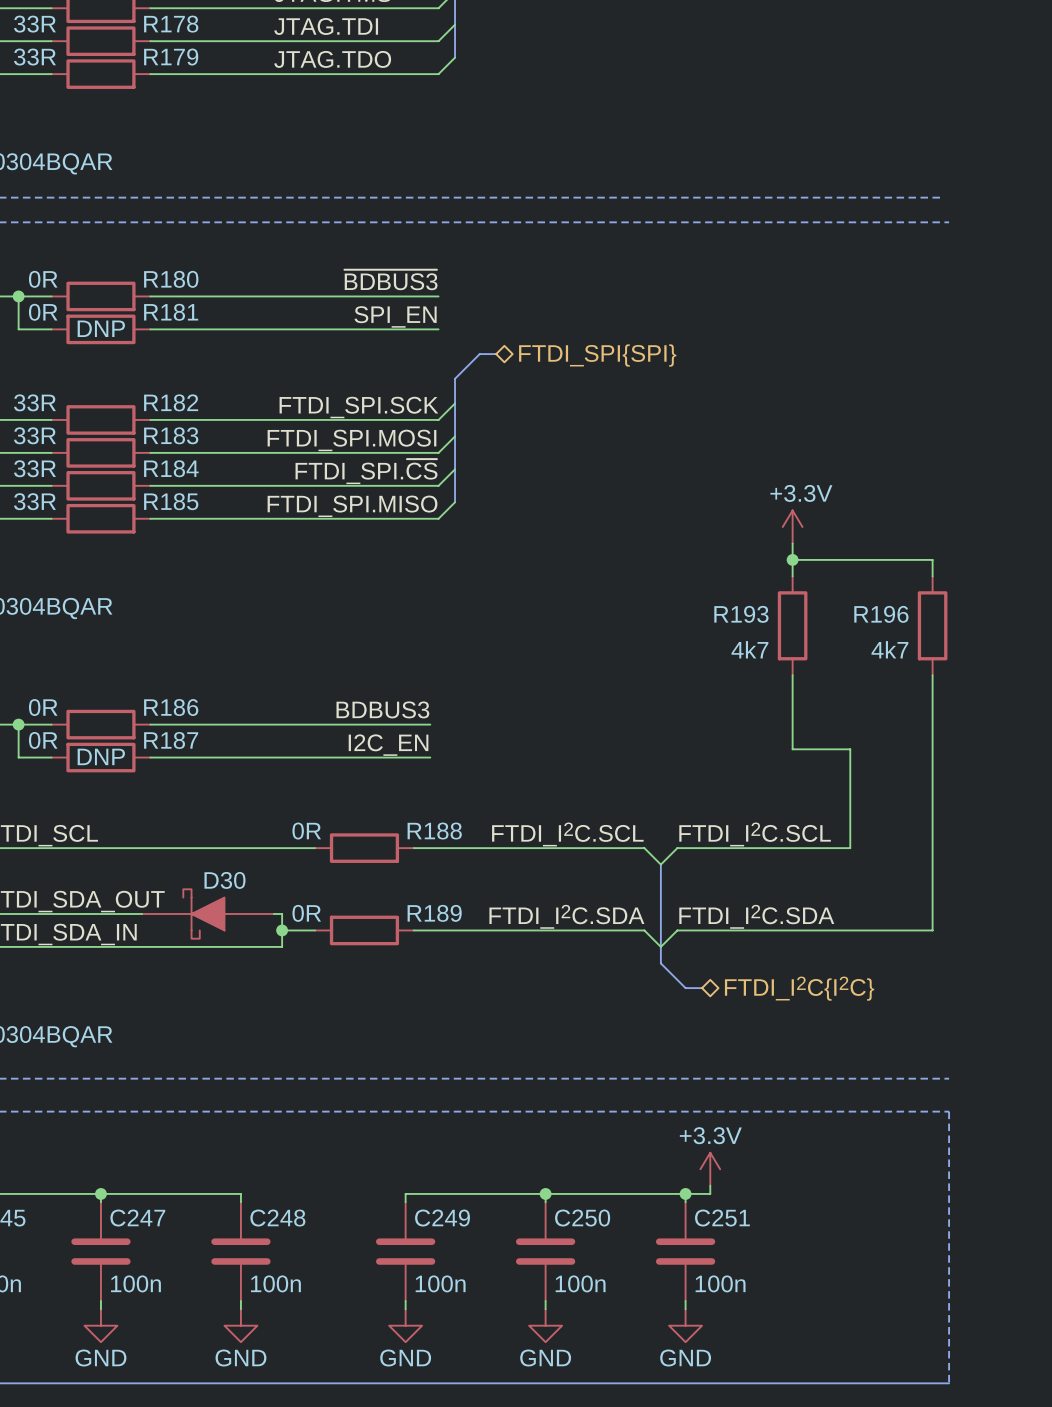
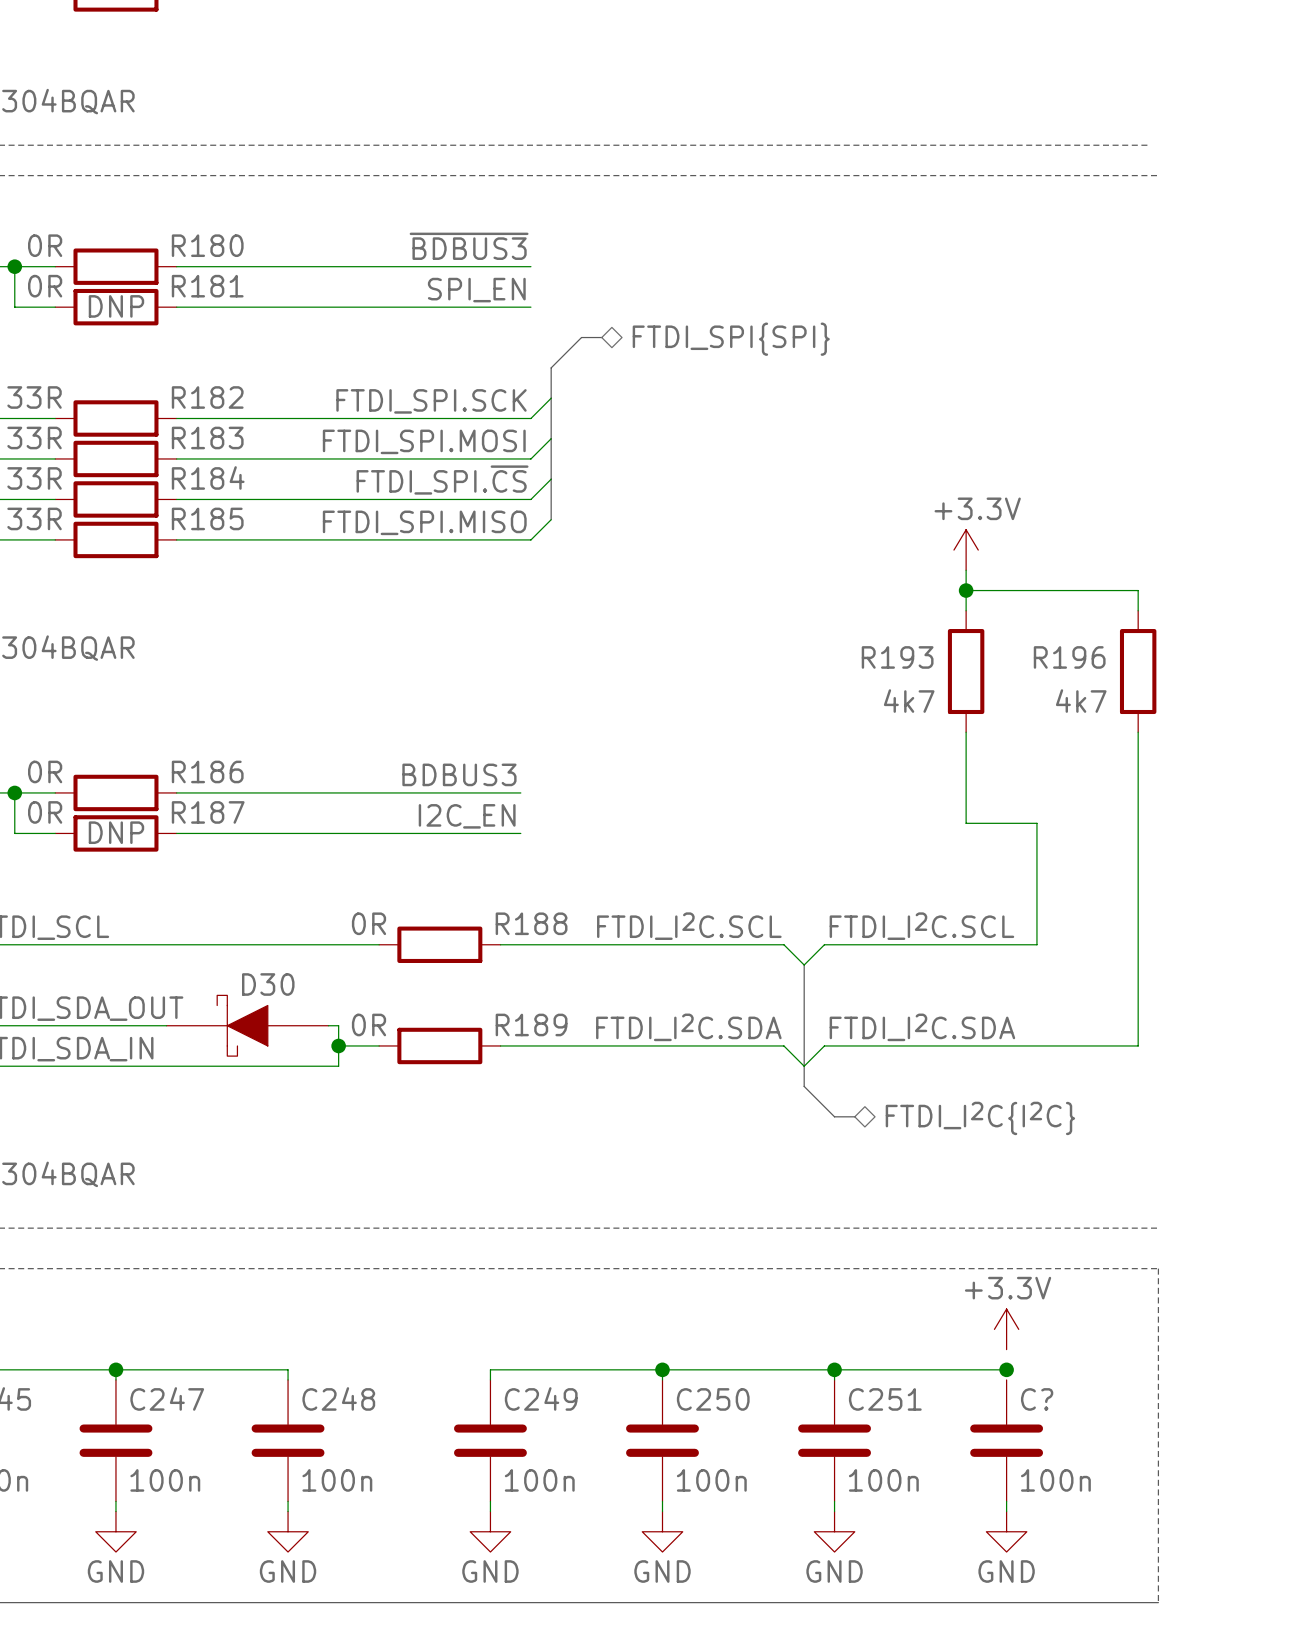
power symbol position: +3.3V (710, 1169) -> +3.3V (1006, 1329)
wire: (710, 1185) (710, 1193) -> (1006, 1369) (864, 1369)
junction: none -> (1006, 1369)
C?: none -> (1006, 1440)
wire: none -> (1006, 1501) (1006, 1511)
power symbol: none -> GND (1006, 1531)

